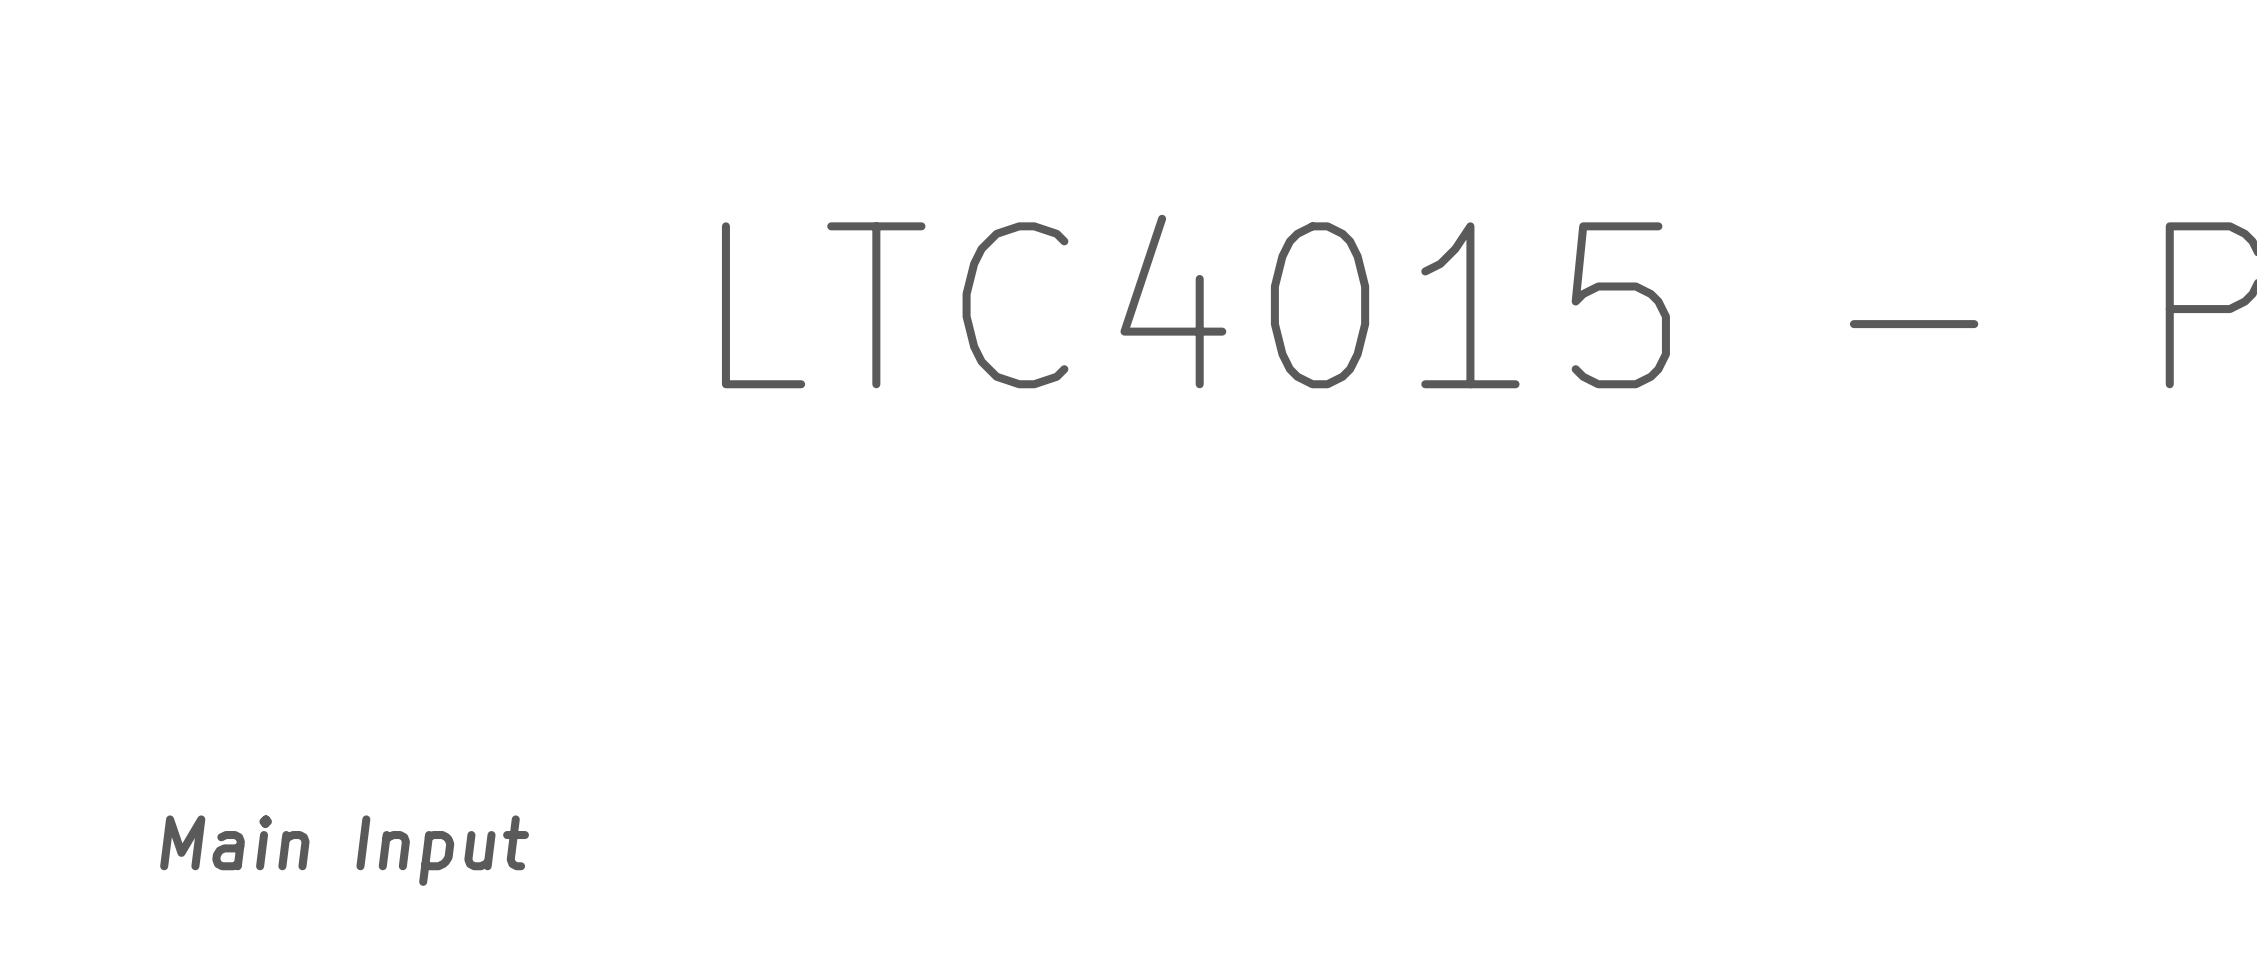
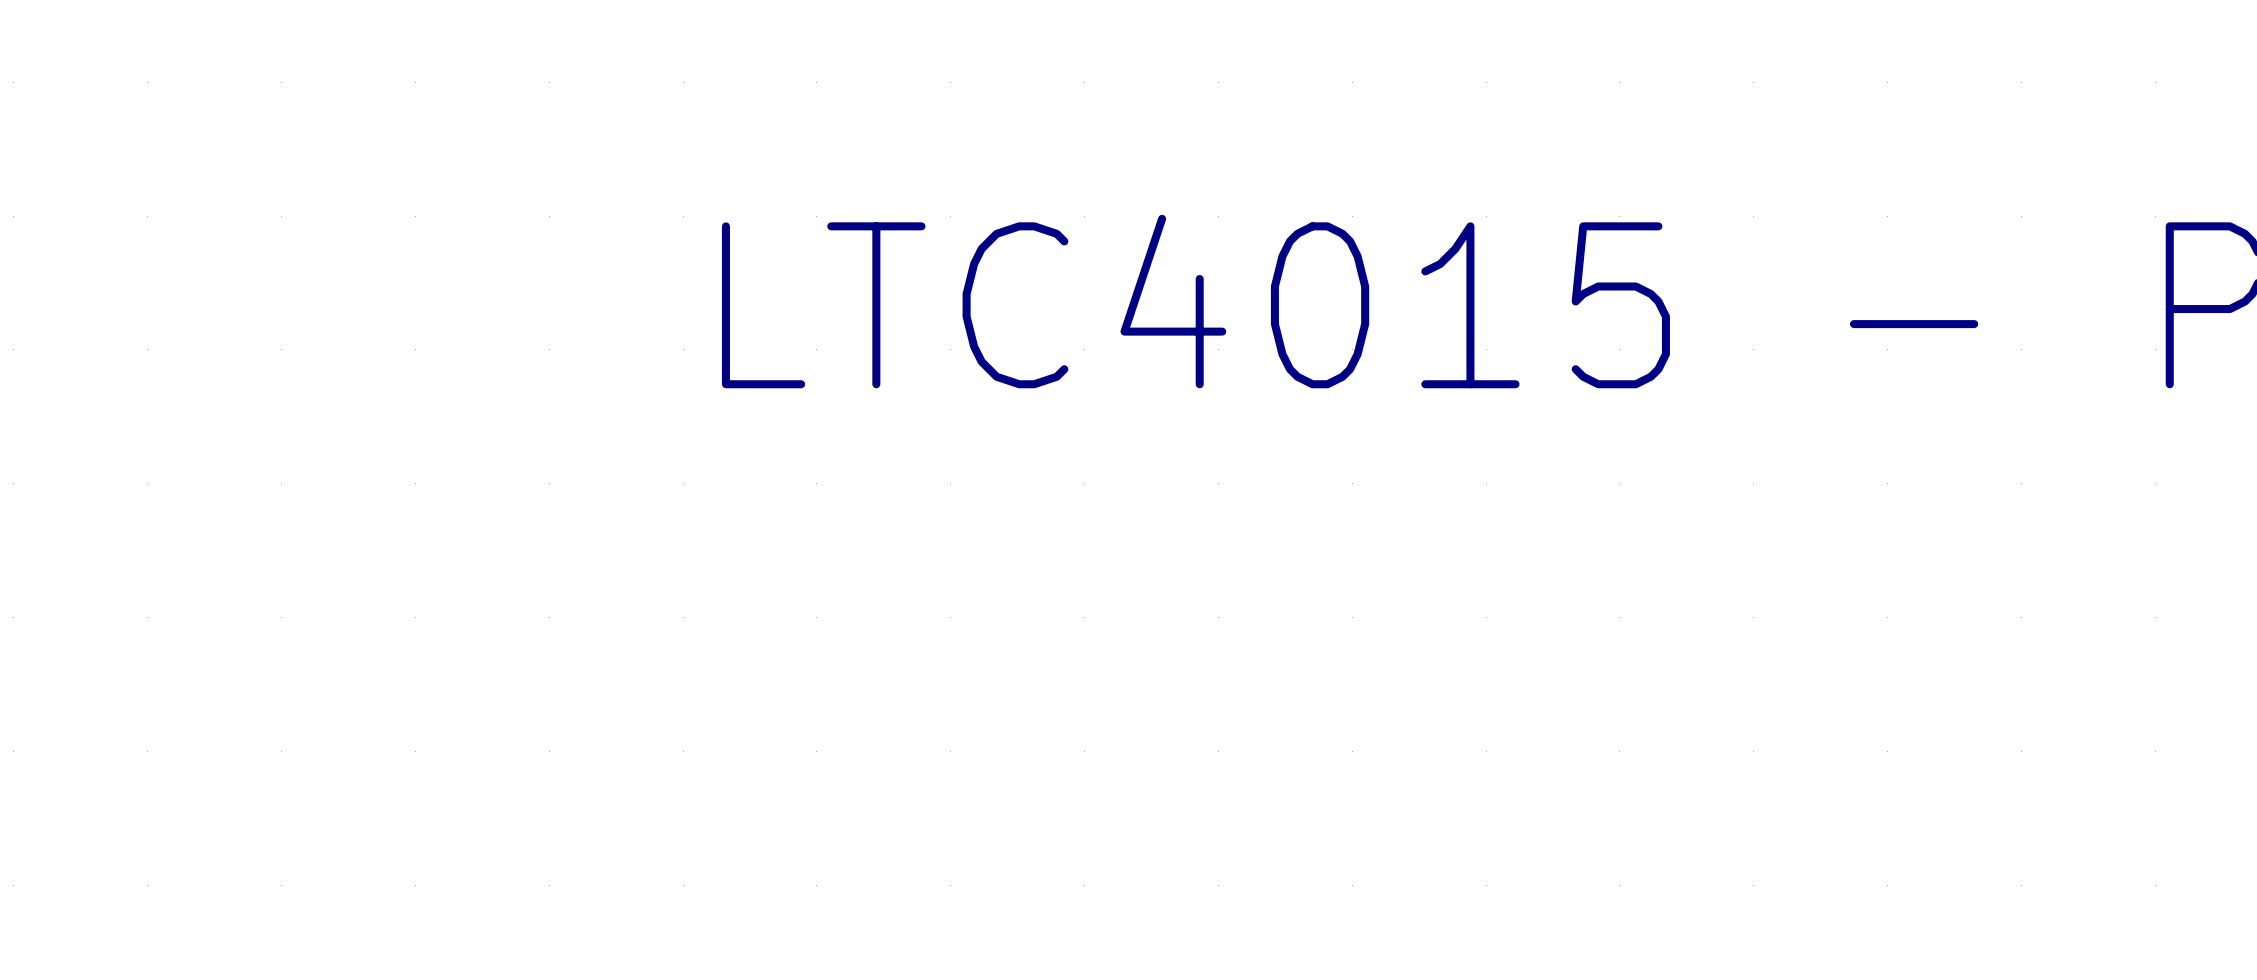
text: Main Input (344, 850) -> none

